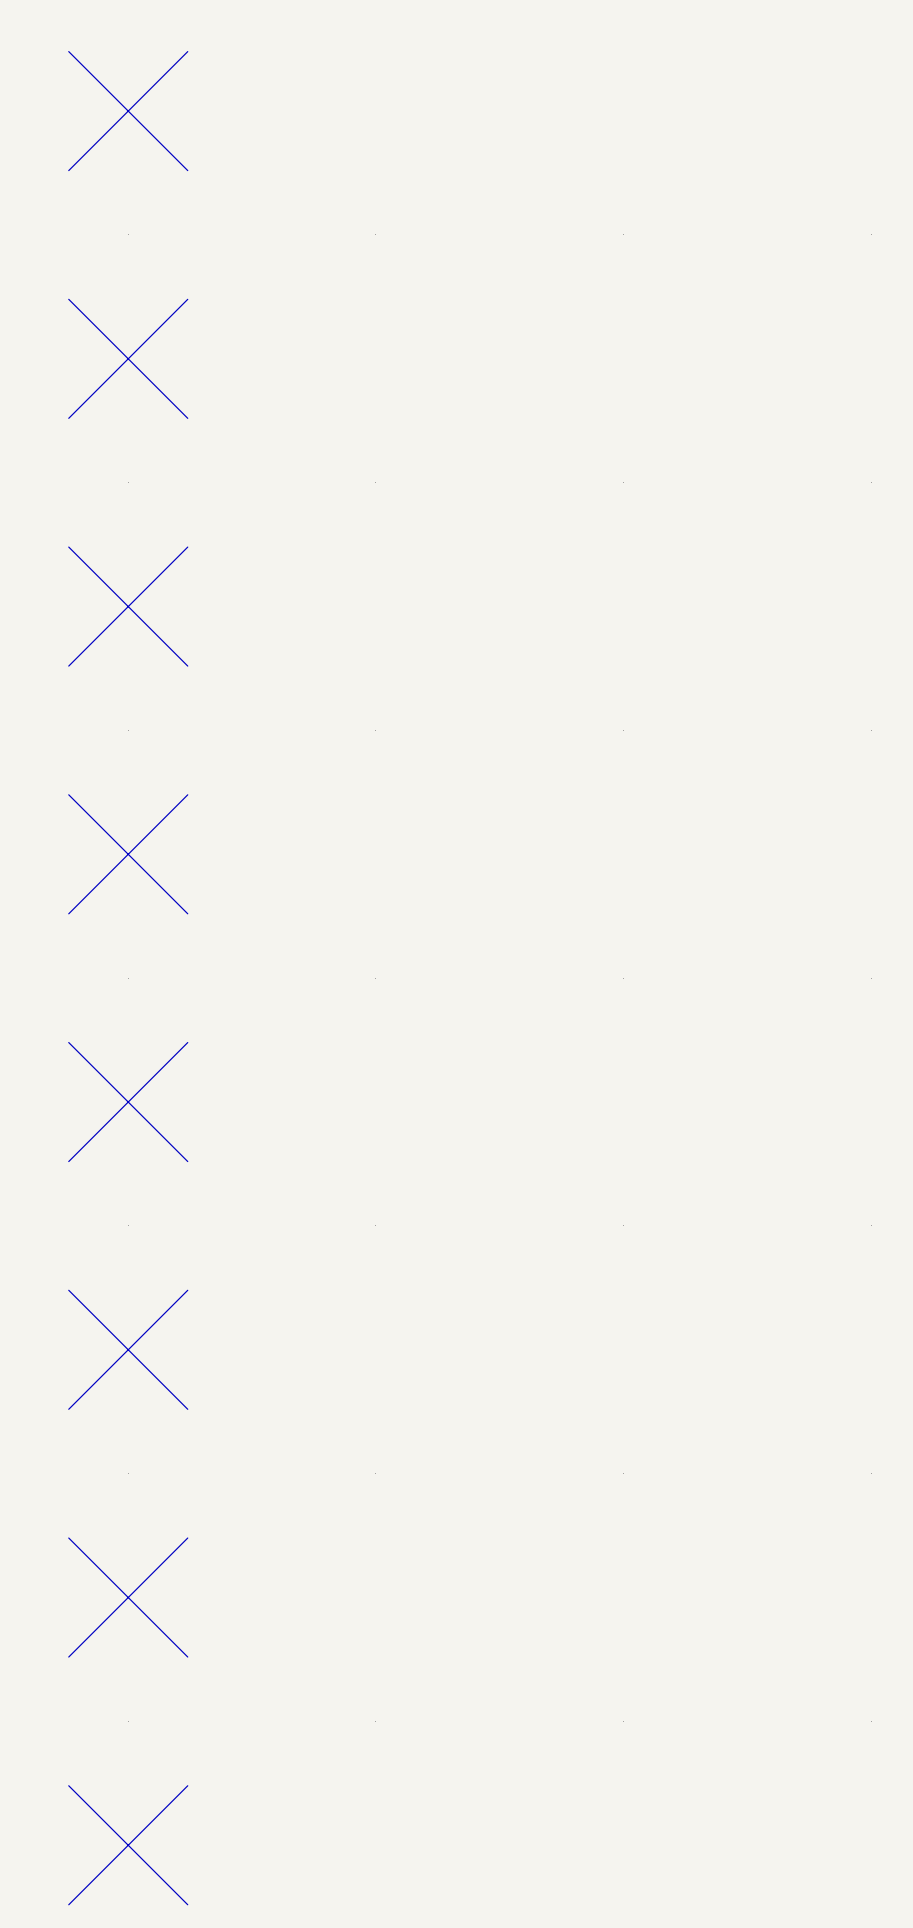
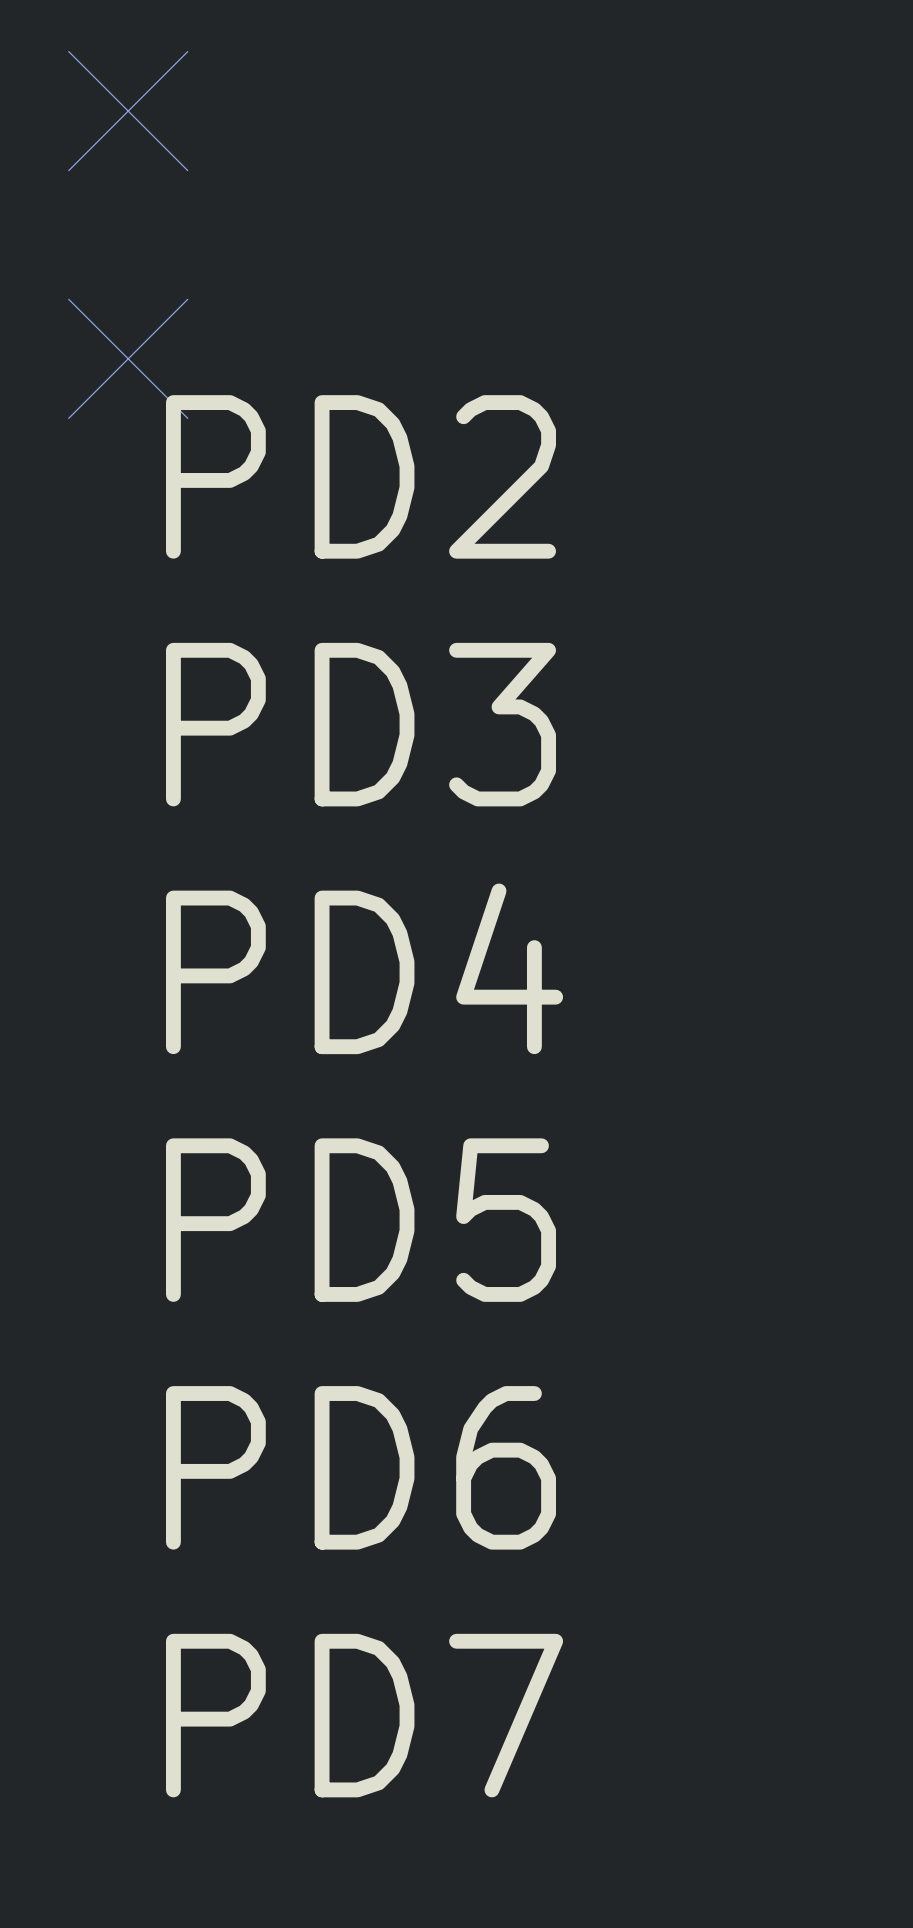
label: none -> PD2 (360, 476)
no-connect mark: (128, 606) -> none
label: none -> PD3 (360, 724)
no-connect mark: (128, 854) -> none
label: none -> PD4 (364, 968)
no-connect mark: (128, 1102) -> none
label: none -> PD5 (360, 1220)
no-connect mark: (128, 1349) -> none
label: none -> PD6 (360, 1467)
no-connect mark: (128, 1597) -> none
label: none -> PD7 (364, 1715)
no-connect mark: (128, 1845) -> none

